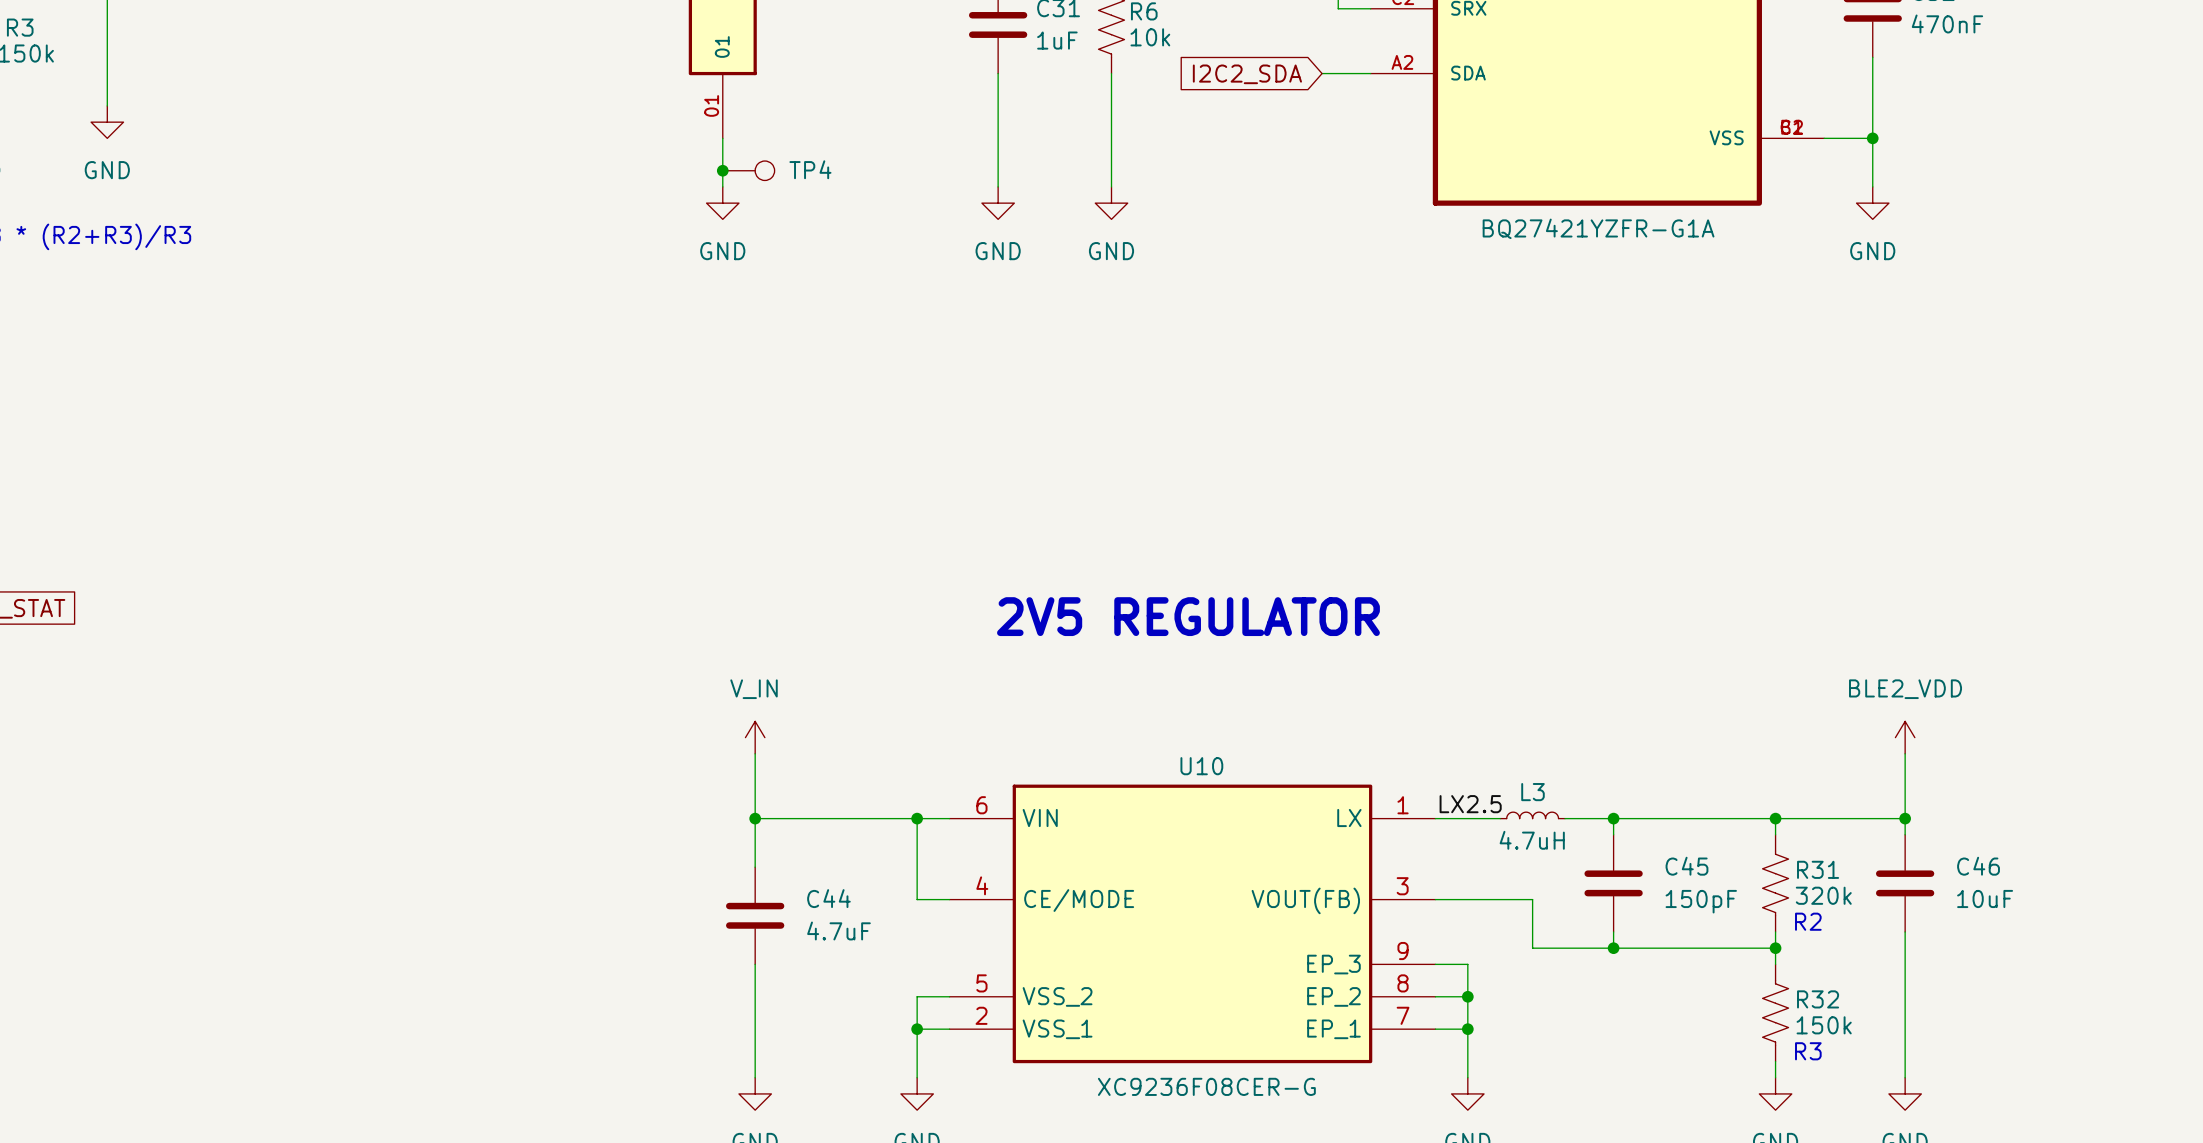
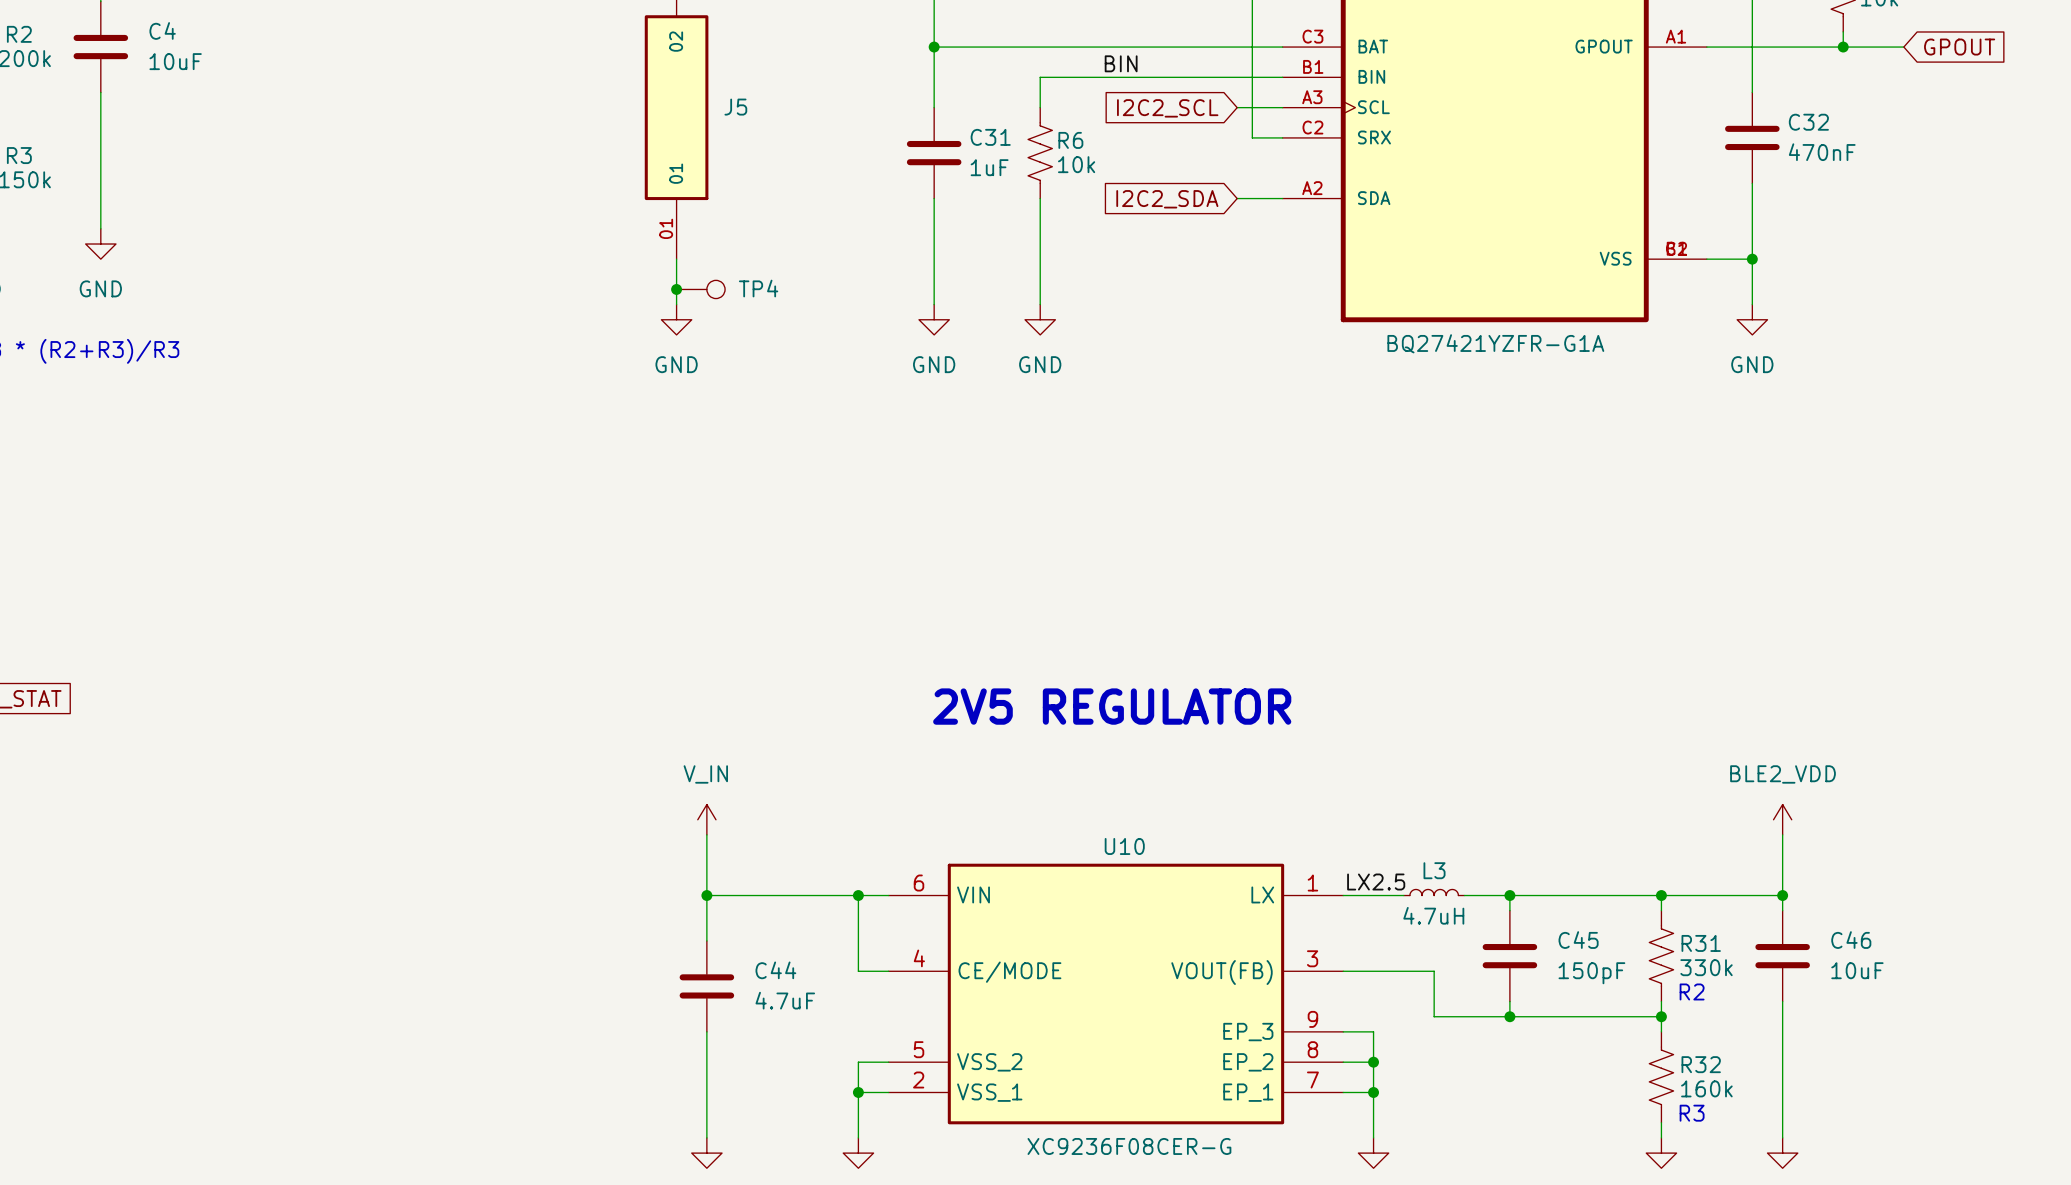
R31 value: 320k (1823, 895) -> 330k (1706, 967)
R32 value: 150k (1824, 1025) -> 160k (1706, 1088)

